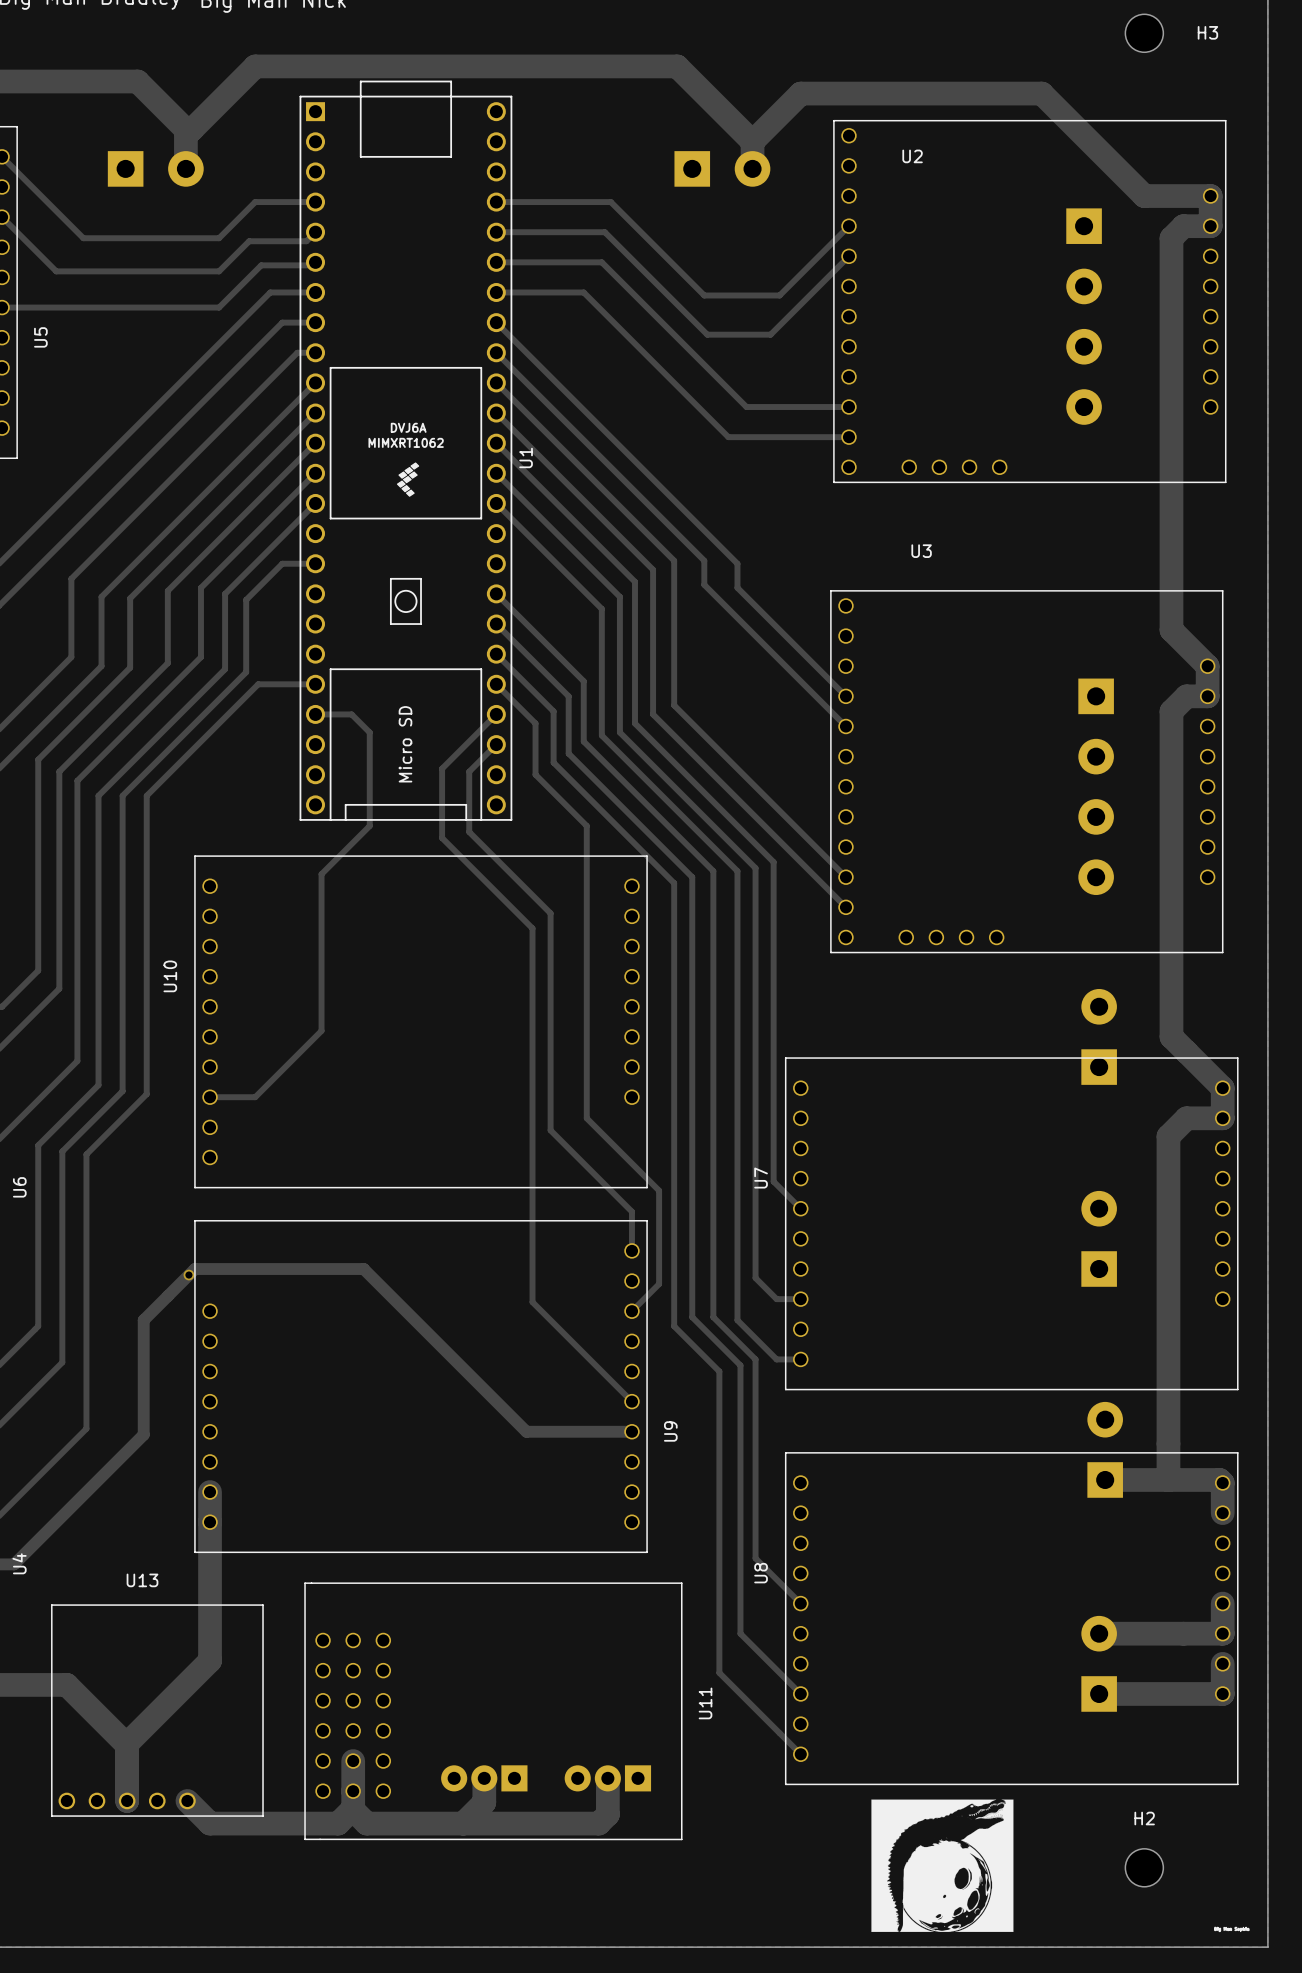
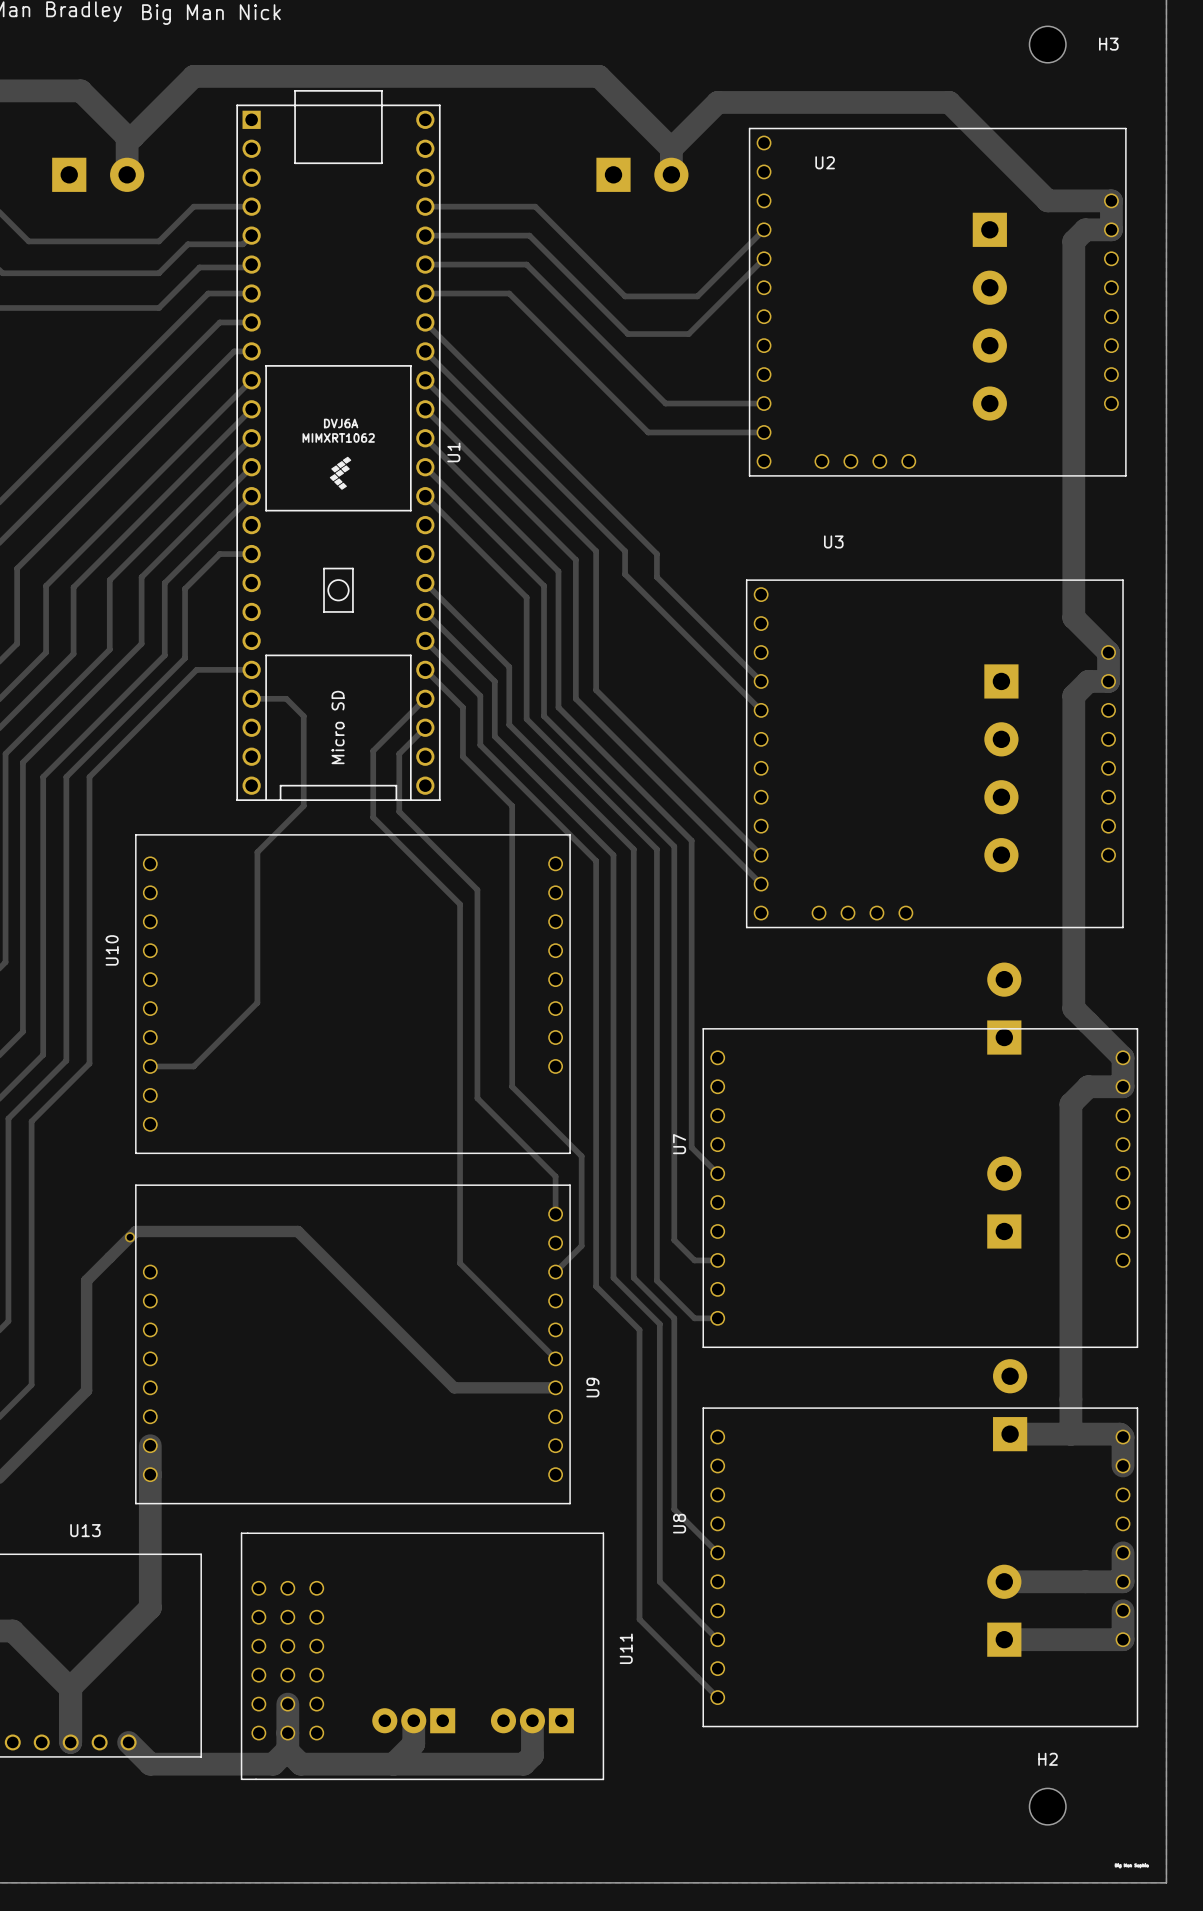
drawing: [871, 1799, 1014, 1932] -> none

